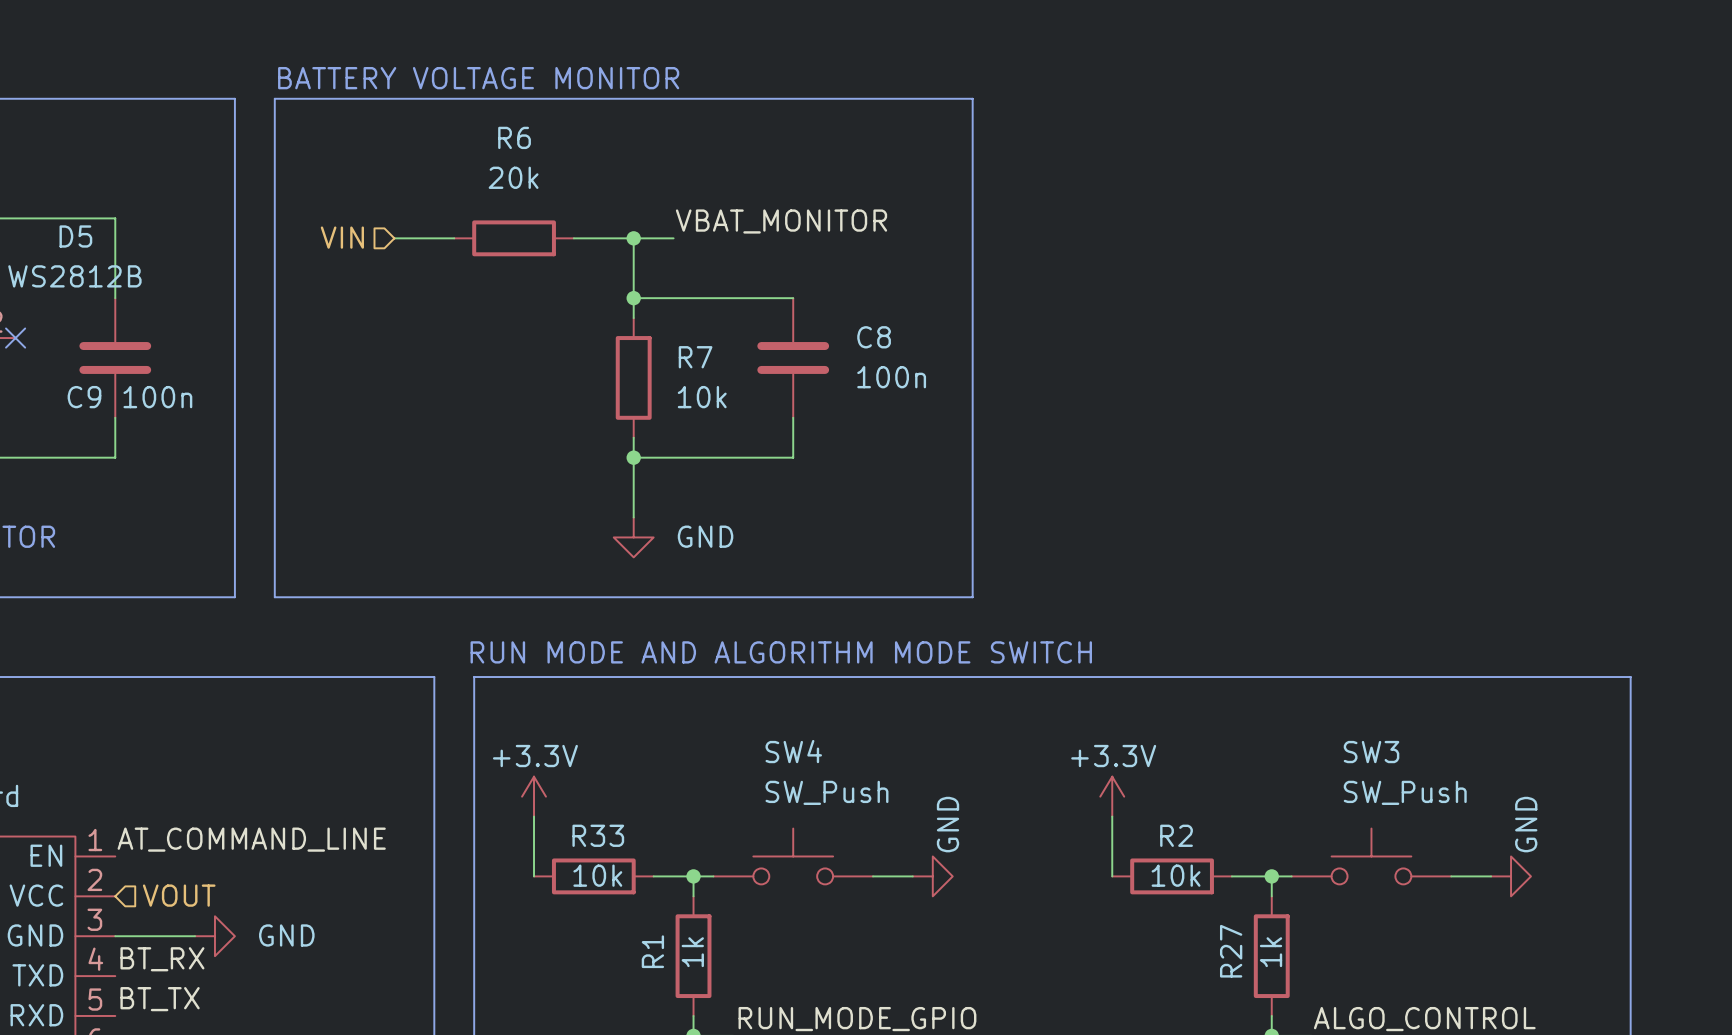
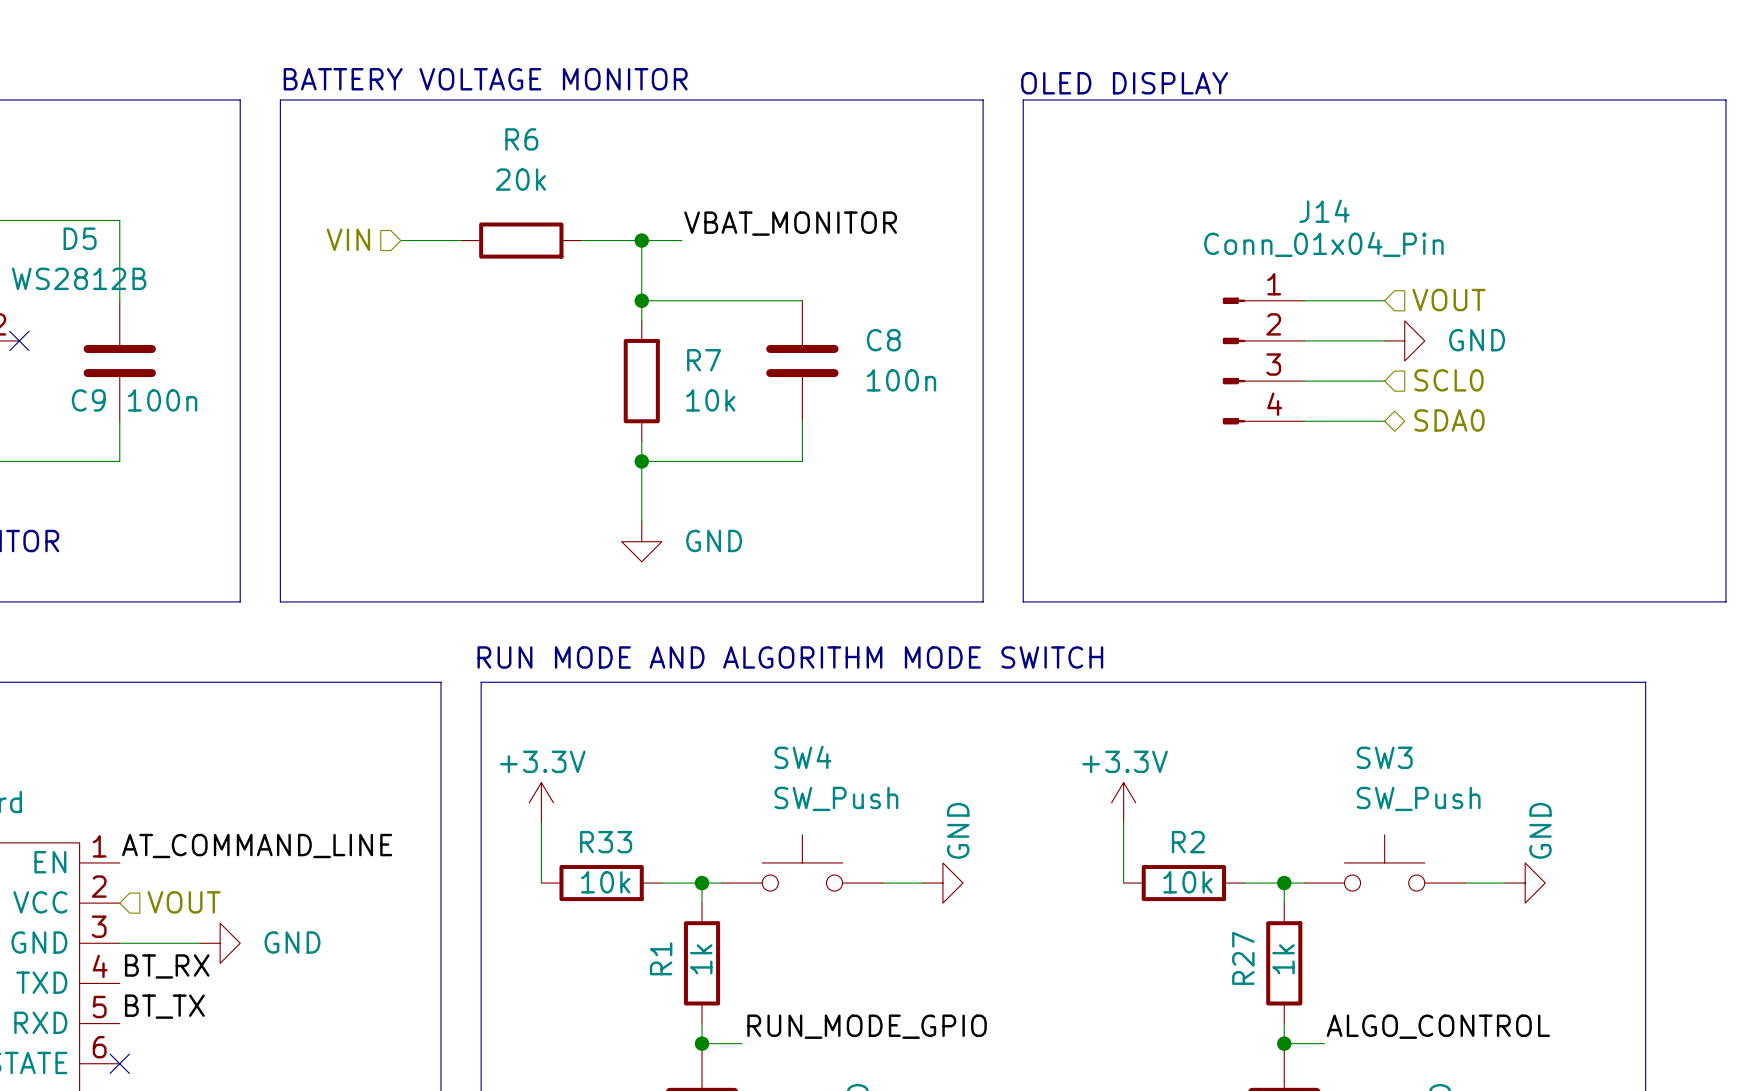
text: none -> OLED DISPLAY (1124, 83)
line: none -> (1023, 100) (1725, 100) (1725, 601) (1023, 601) (1023, 100)
hierarchical label: none -> VOUT (1449, 300)
wire: none -> (1304, 300) (1384, 300)
wire: none -> (1304, 340) (1384, 340)
power symbol: none -> GND (1404, 340)
J14: none -> Conn_01x04_Pin (1263, 361)
wire: none -> (1304, 381) (1384, 381)
hierarchical label: none -> SCL0 (1449, 380)
wire: none -> (1304, 421) (1384, 421)
hierarchical label: none -> SDA0 (1449, 420)

